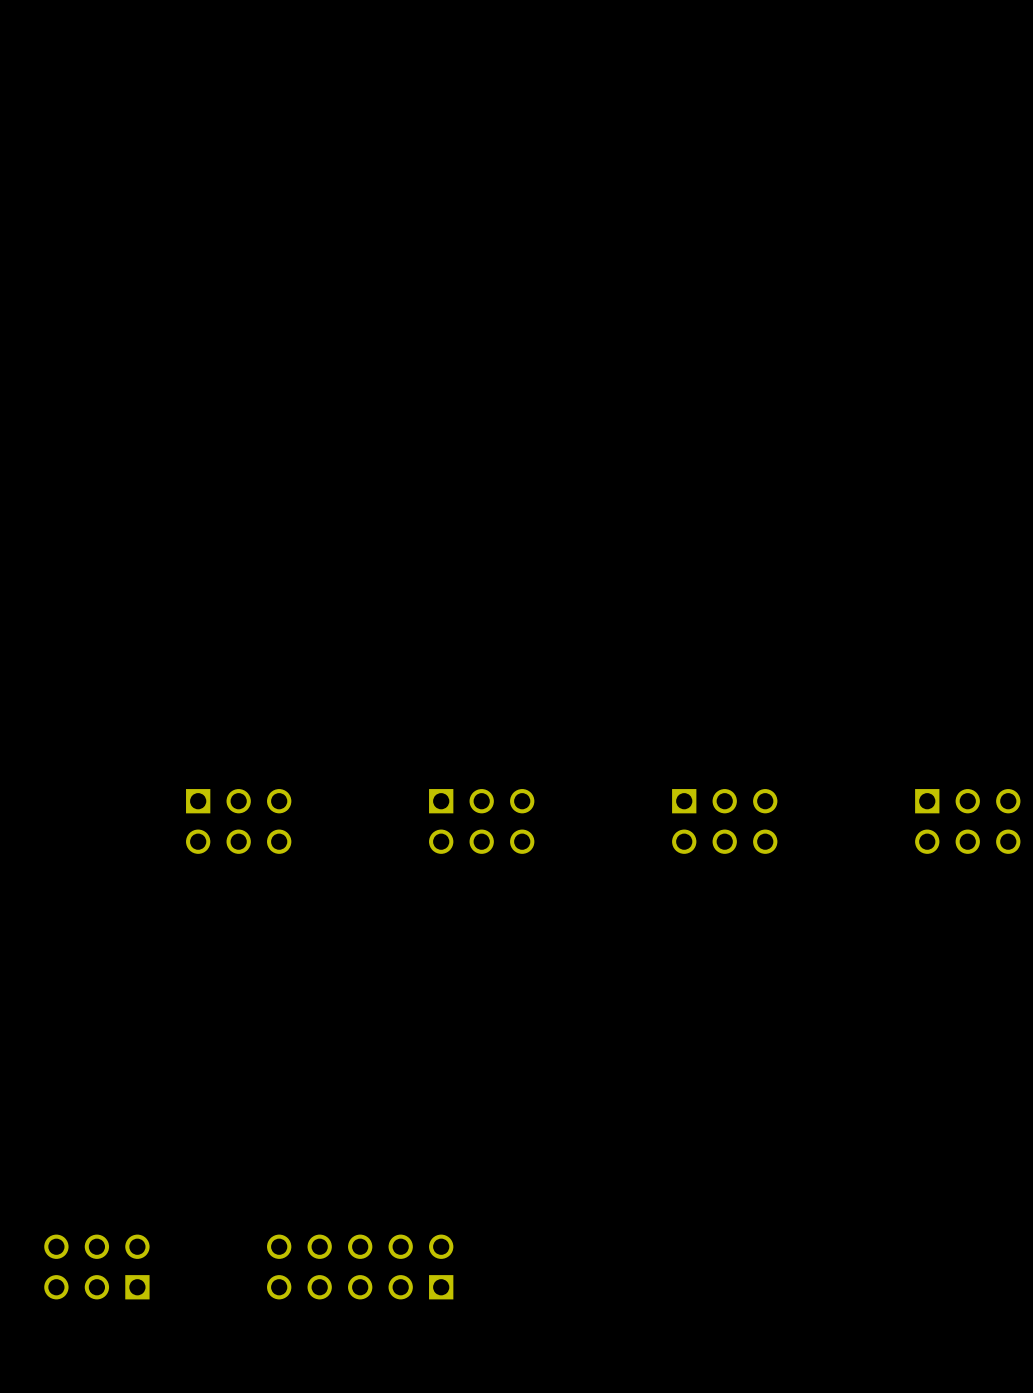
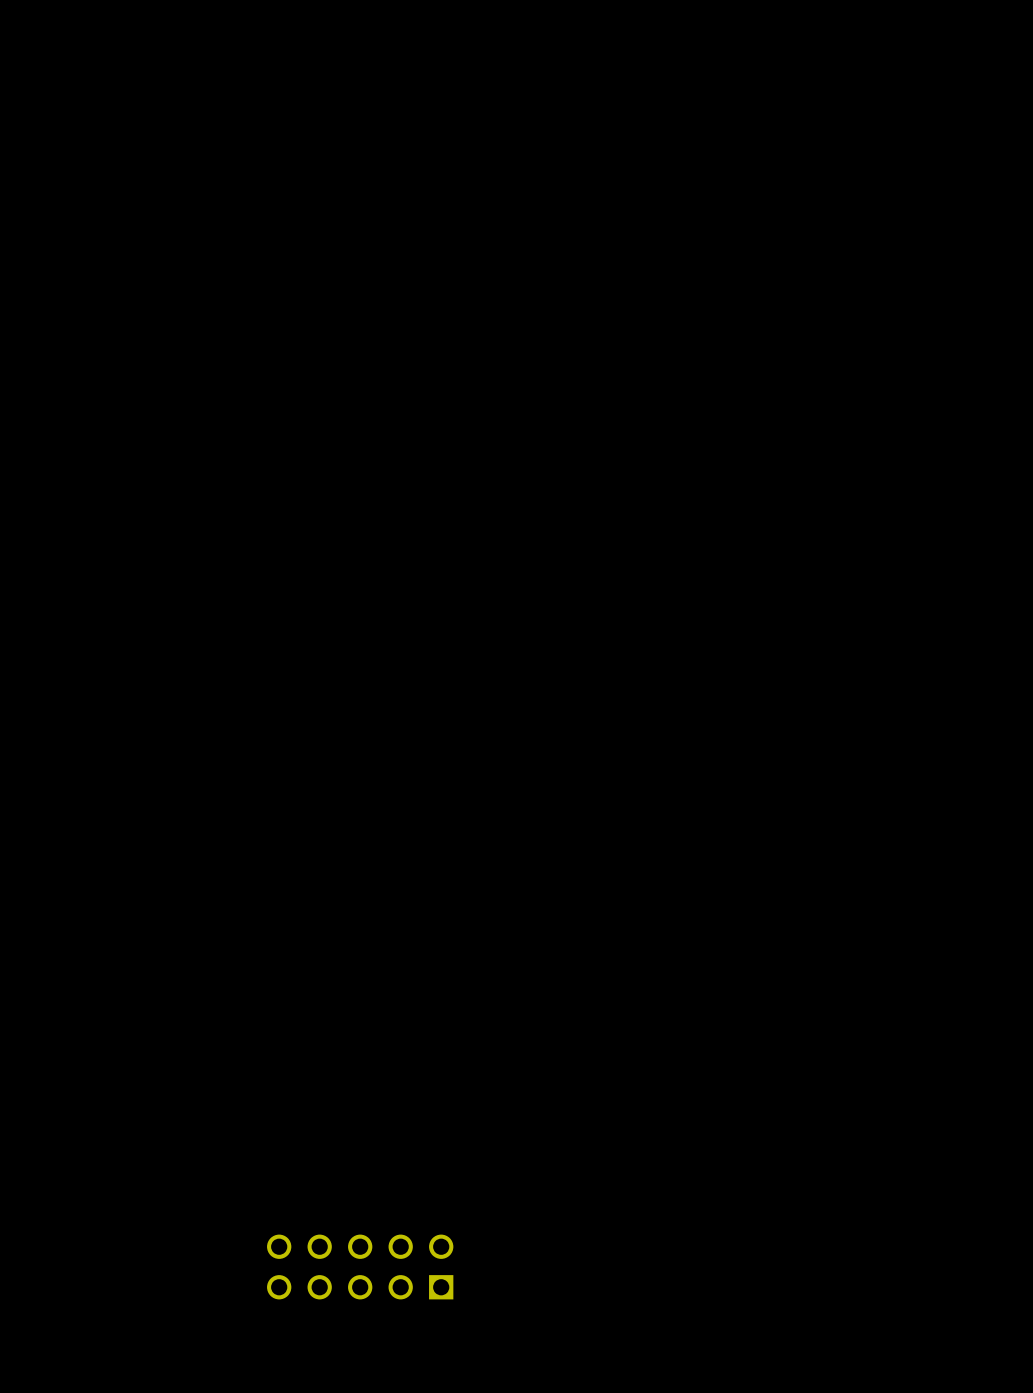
part: (238, 821) -> none
part: (481, 821) -> none
part: (724, 821) -> none
part: (967, 821) -> none
part: (96, 1267) -> none

